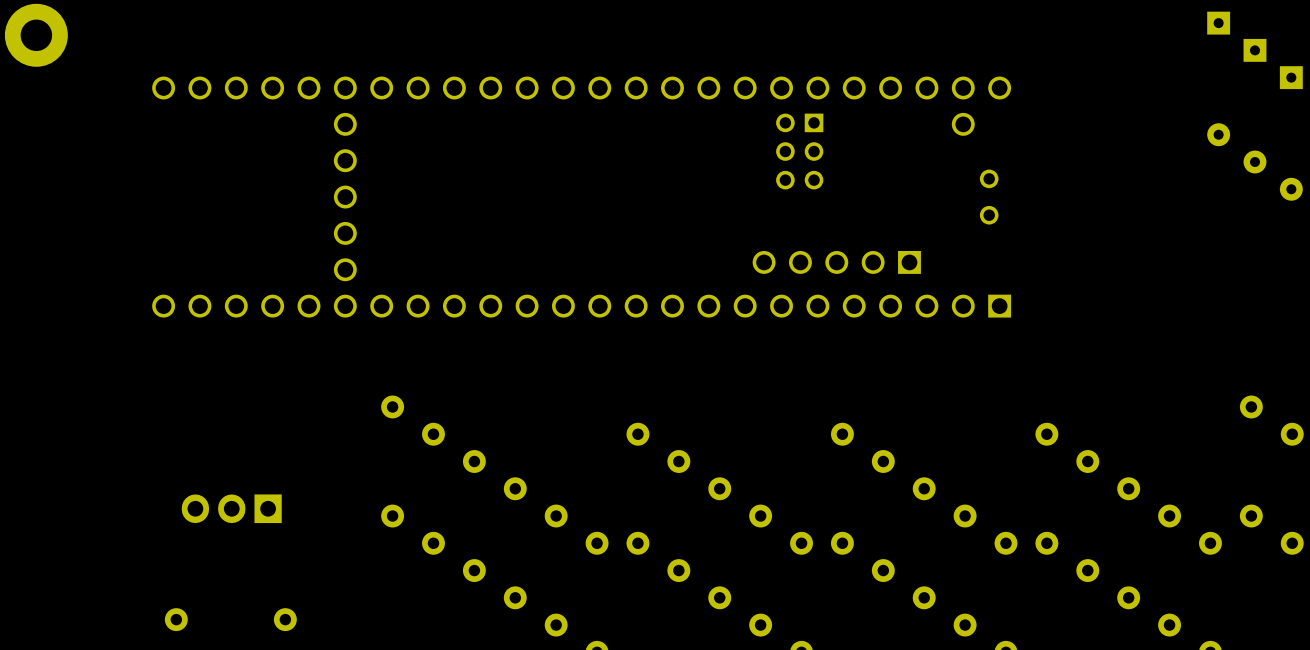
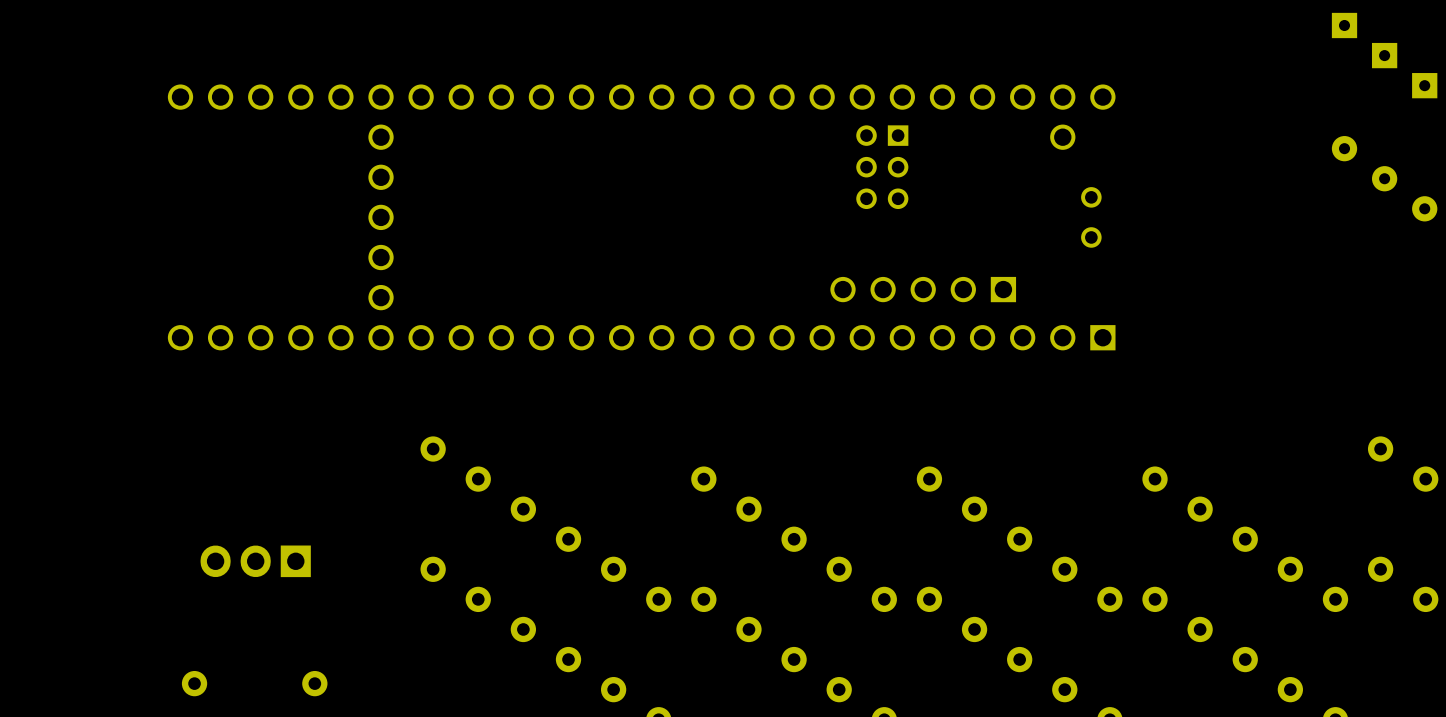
part: (36, 35) -> none

